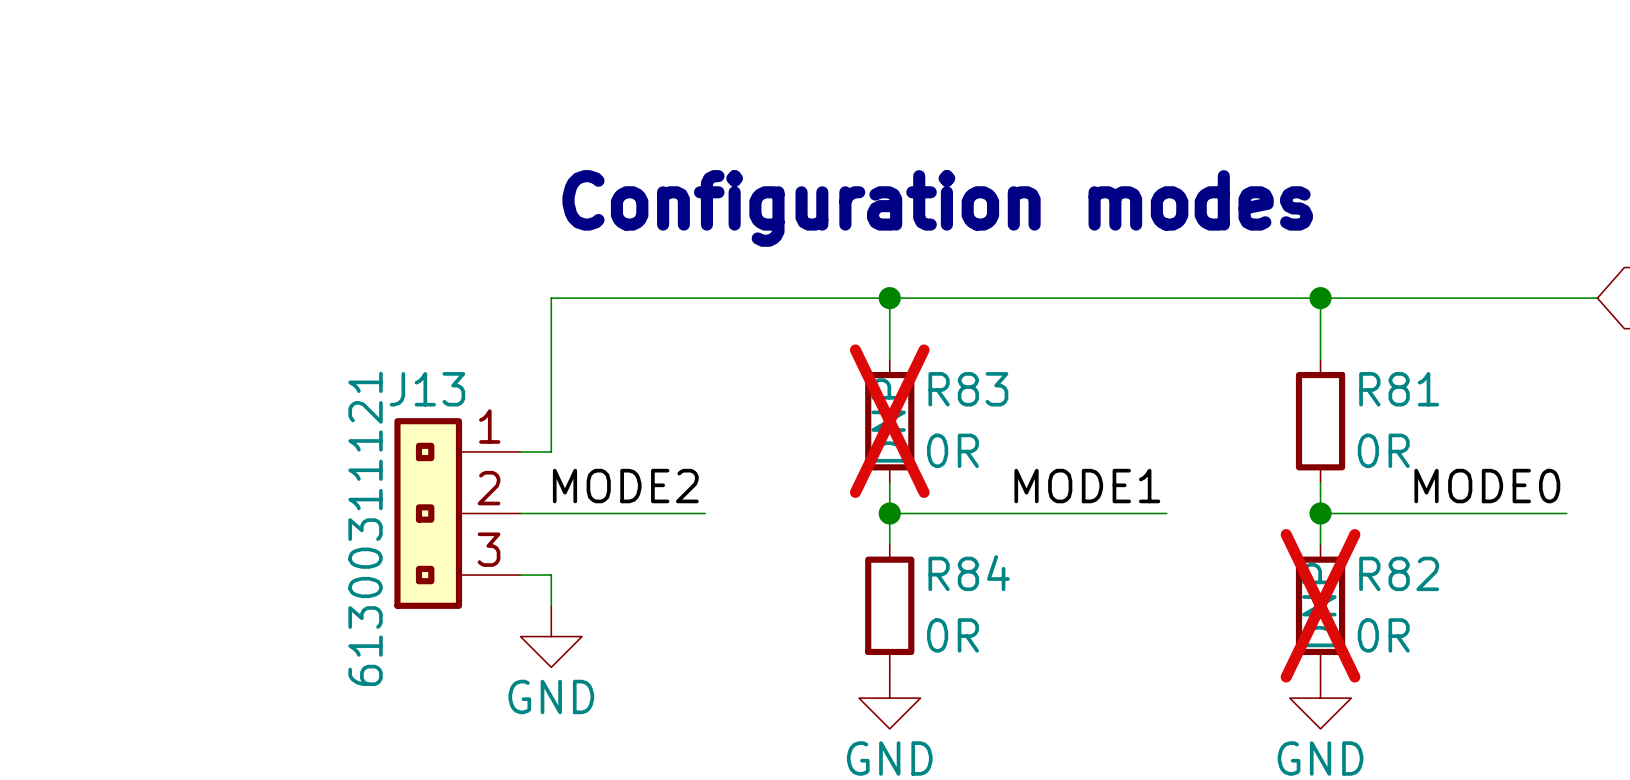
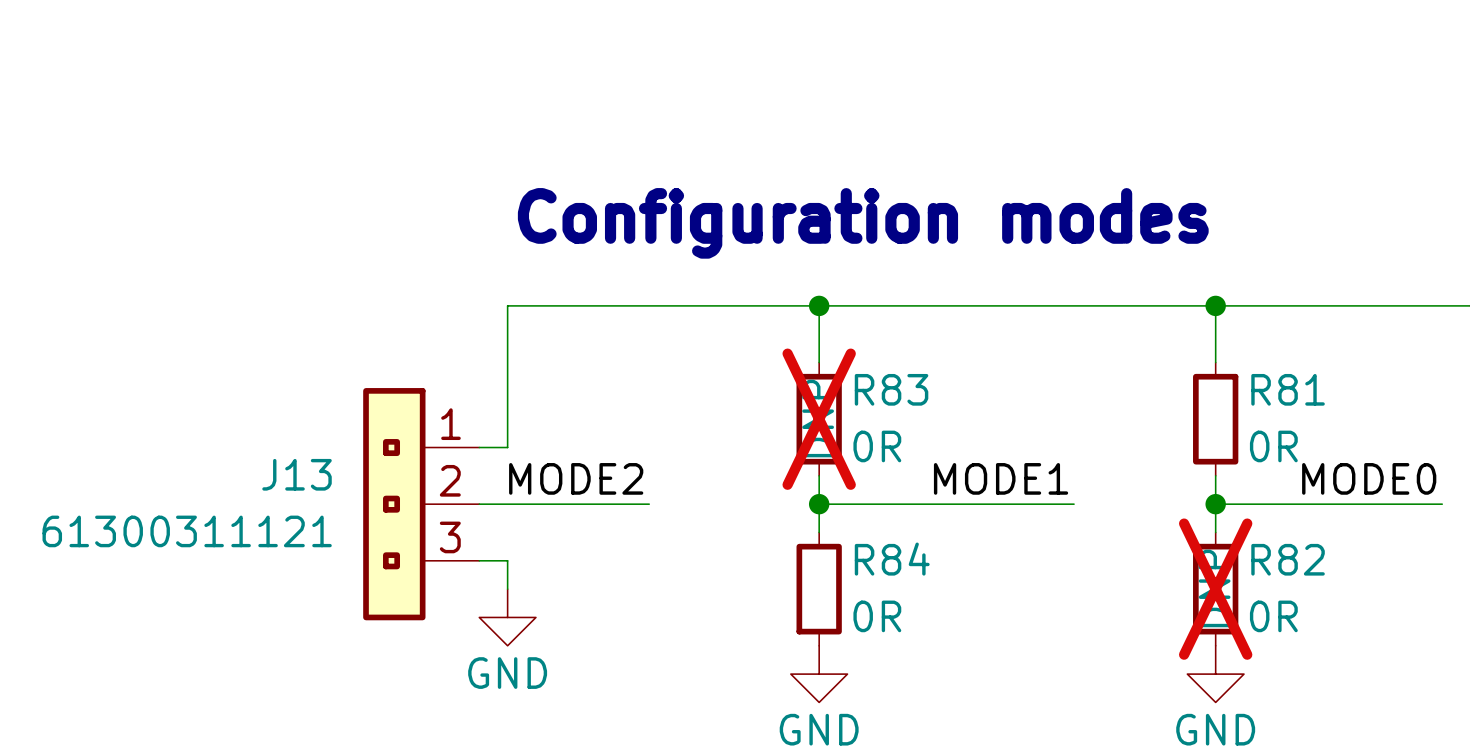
J13 name position: J13 (427, 389) -> J13 (297, 474)
J13 symbol: [394, 418, 521, 609] -> [363, 388, 480, 621]
J13 text position: 61300311121 (365, 528) -> 61300311121 (187, 531)

